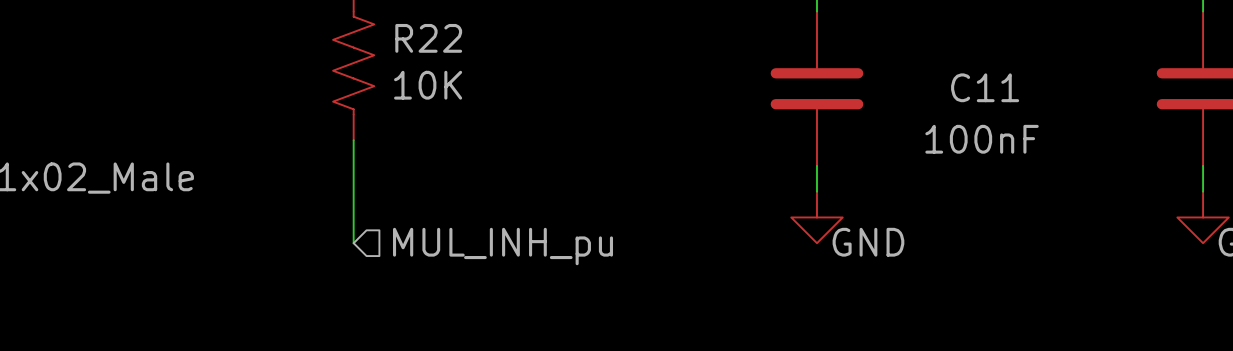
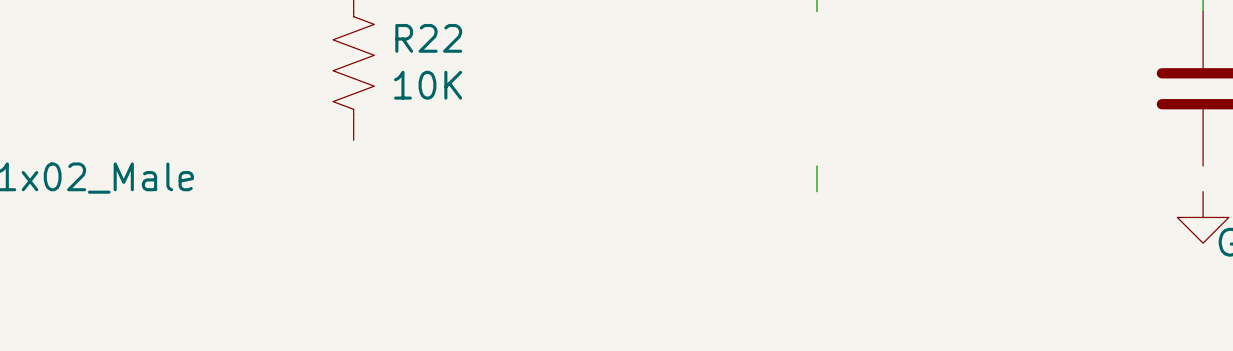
C11: 100nF (816, 88) -> none
wire: (353, 140) (353, 243) -> none
wire: (1203, 165) (1203, 191) -> none
power symbol: GND (816, 217) -> none
hierarchical label: MUL_INH_pu (503, 246) -> none

